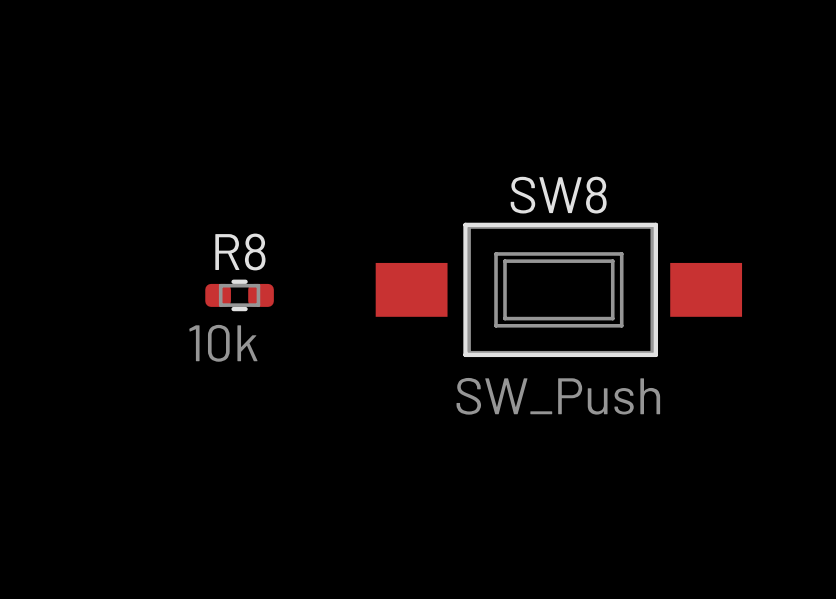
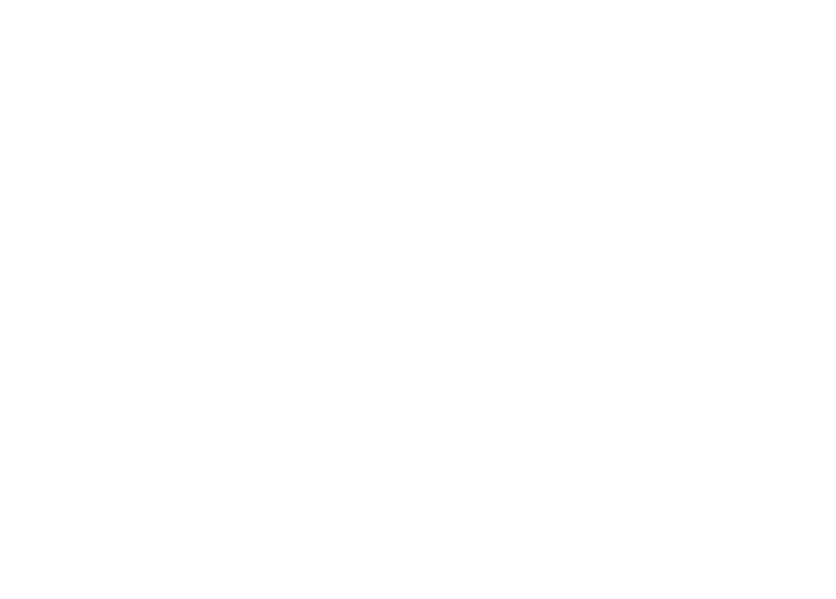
SW8: SW_Push (558, 289) -> none
R8: 10k (239, 295) -> none

